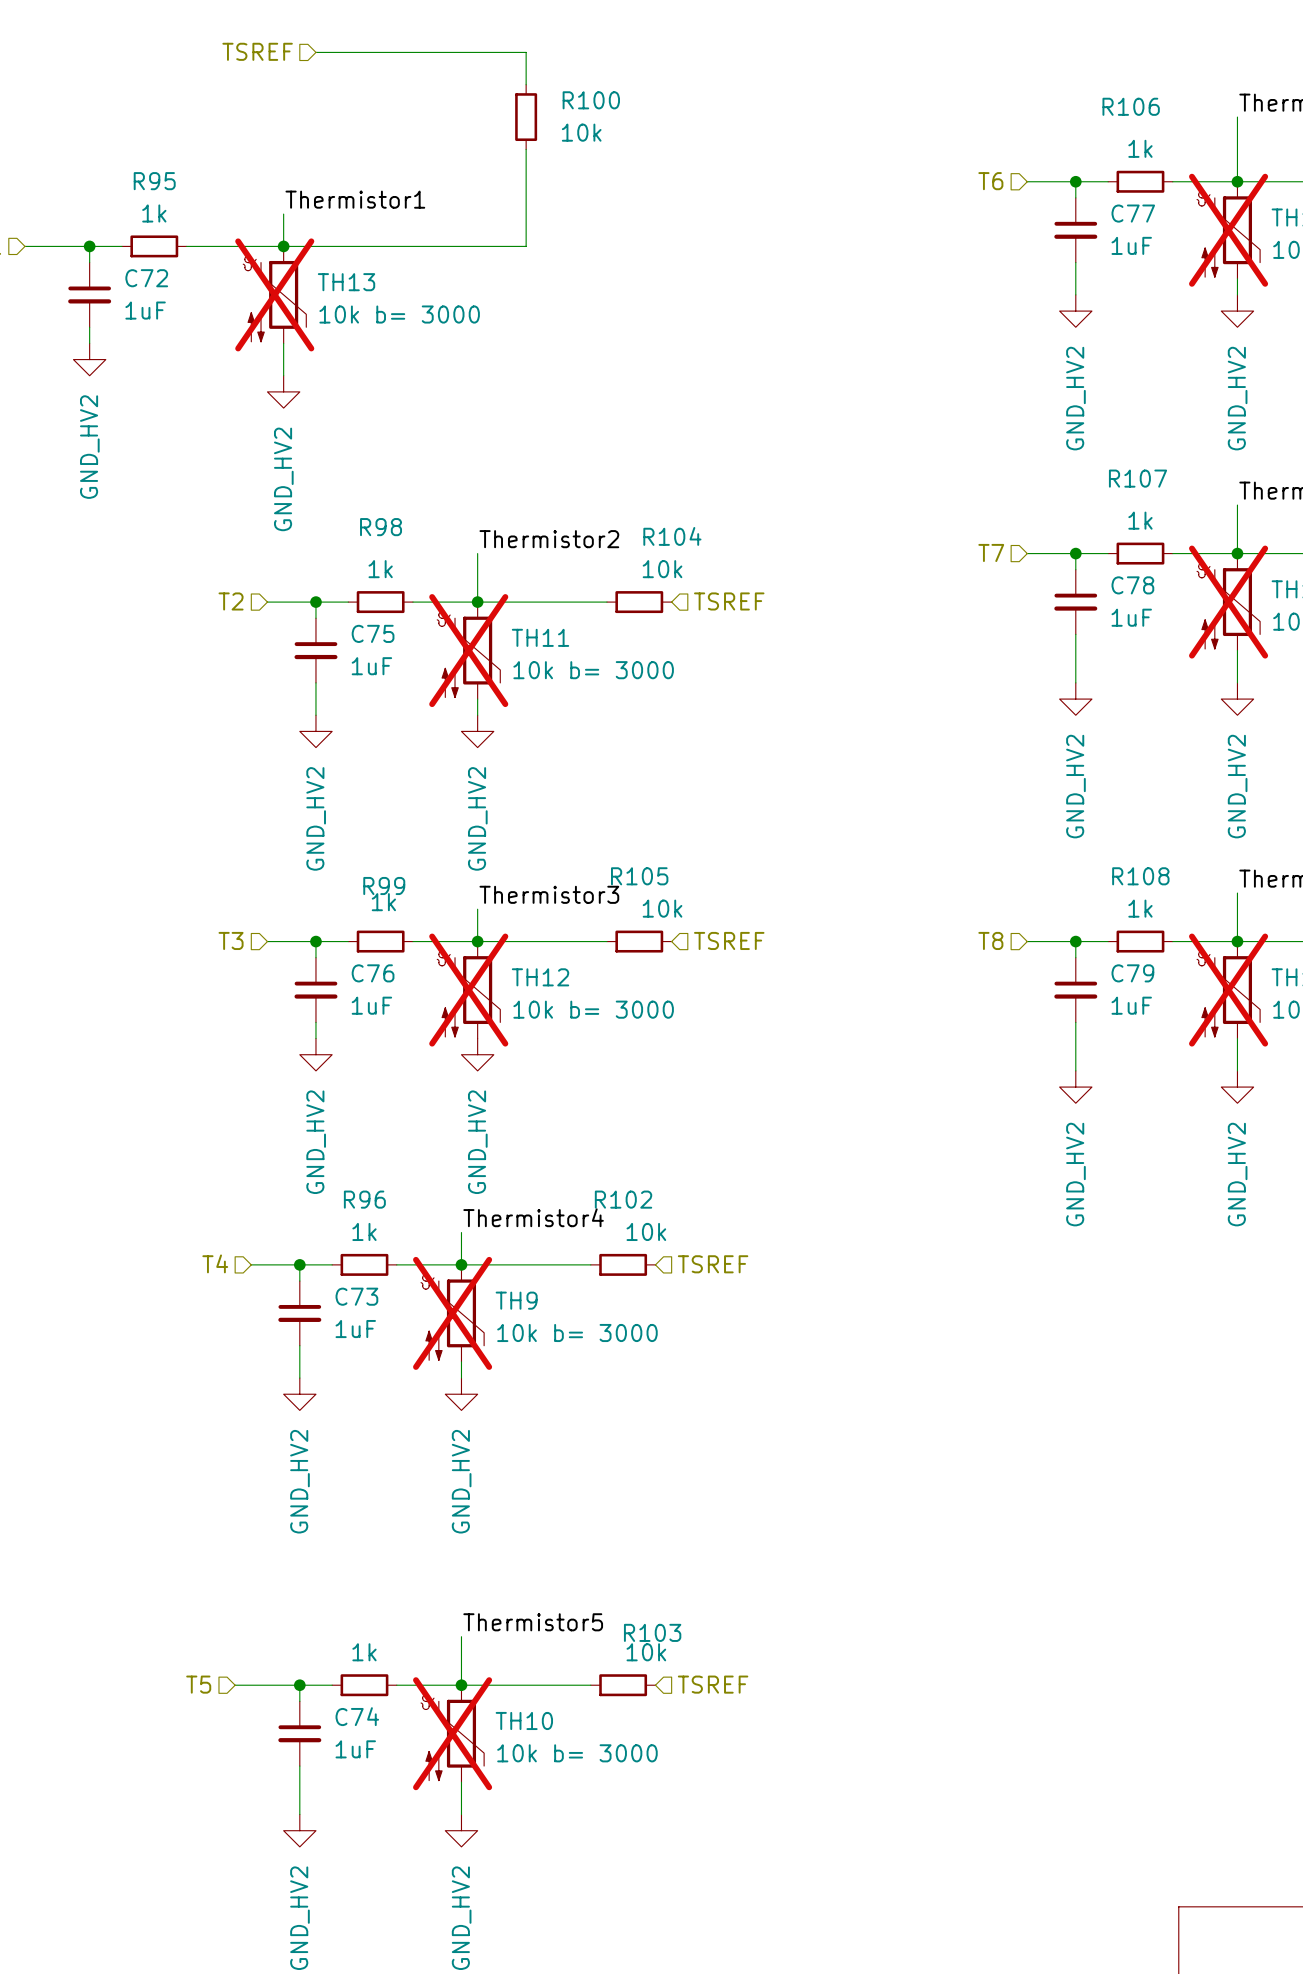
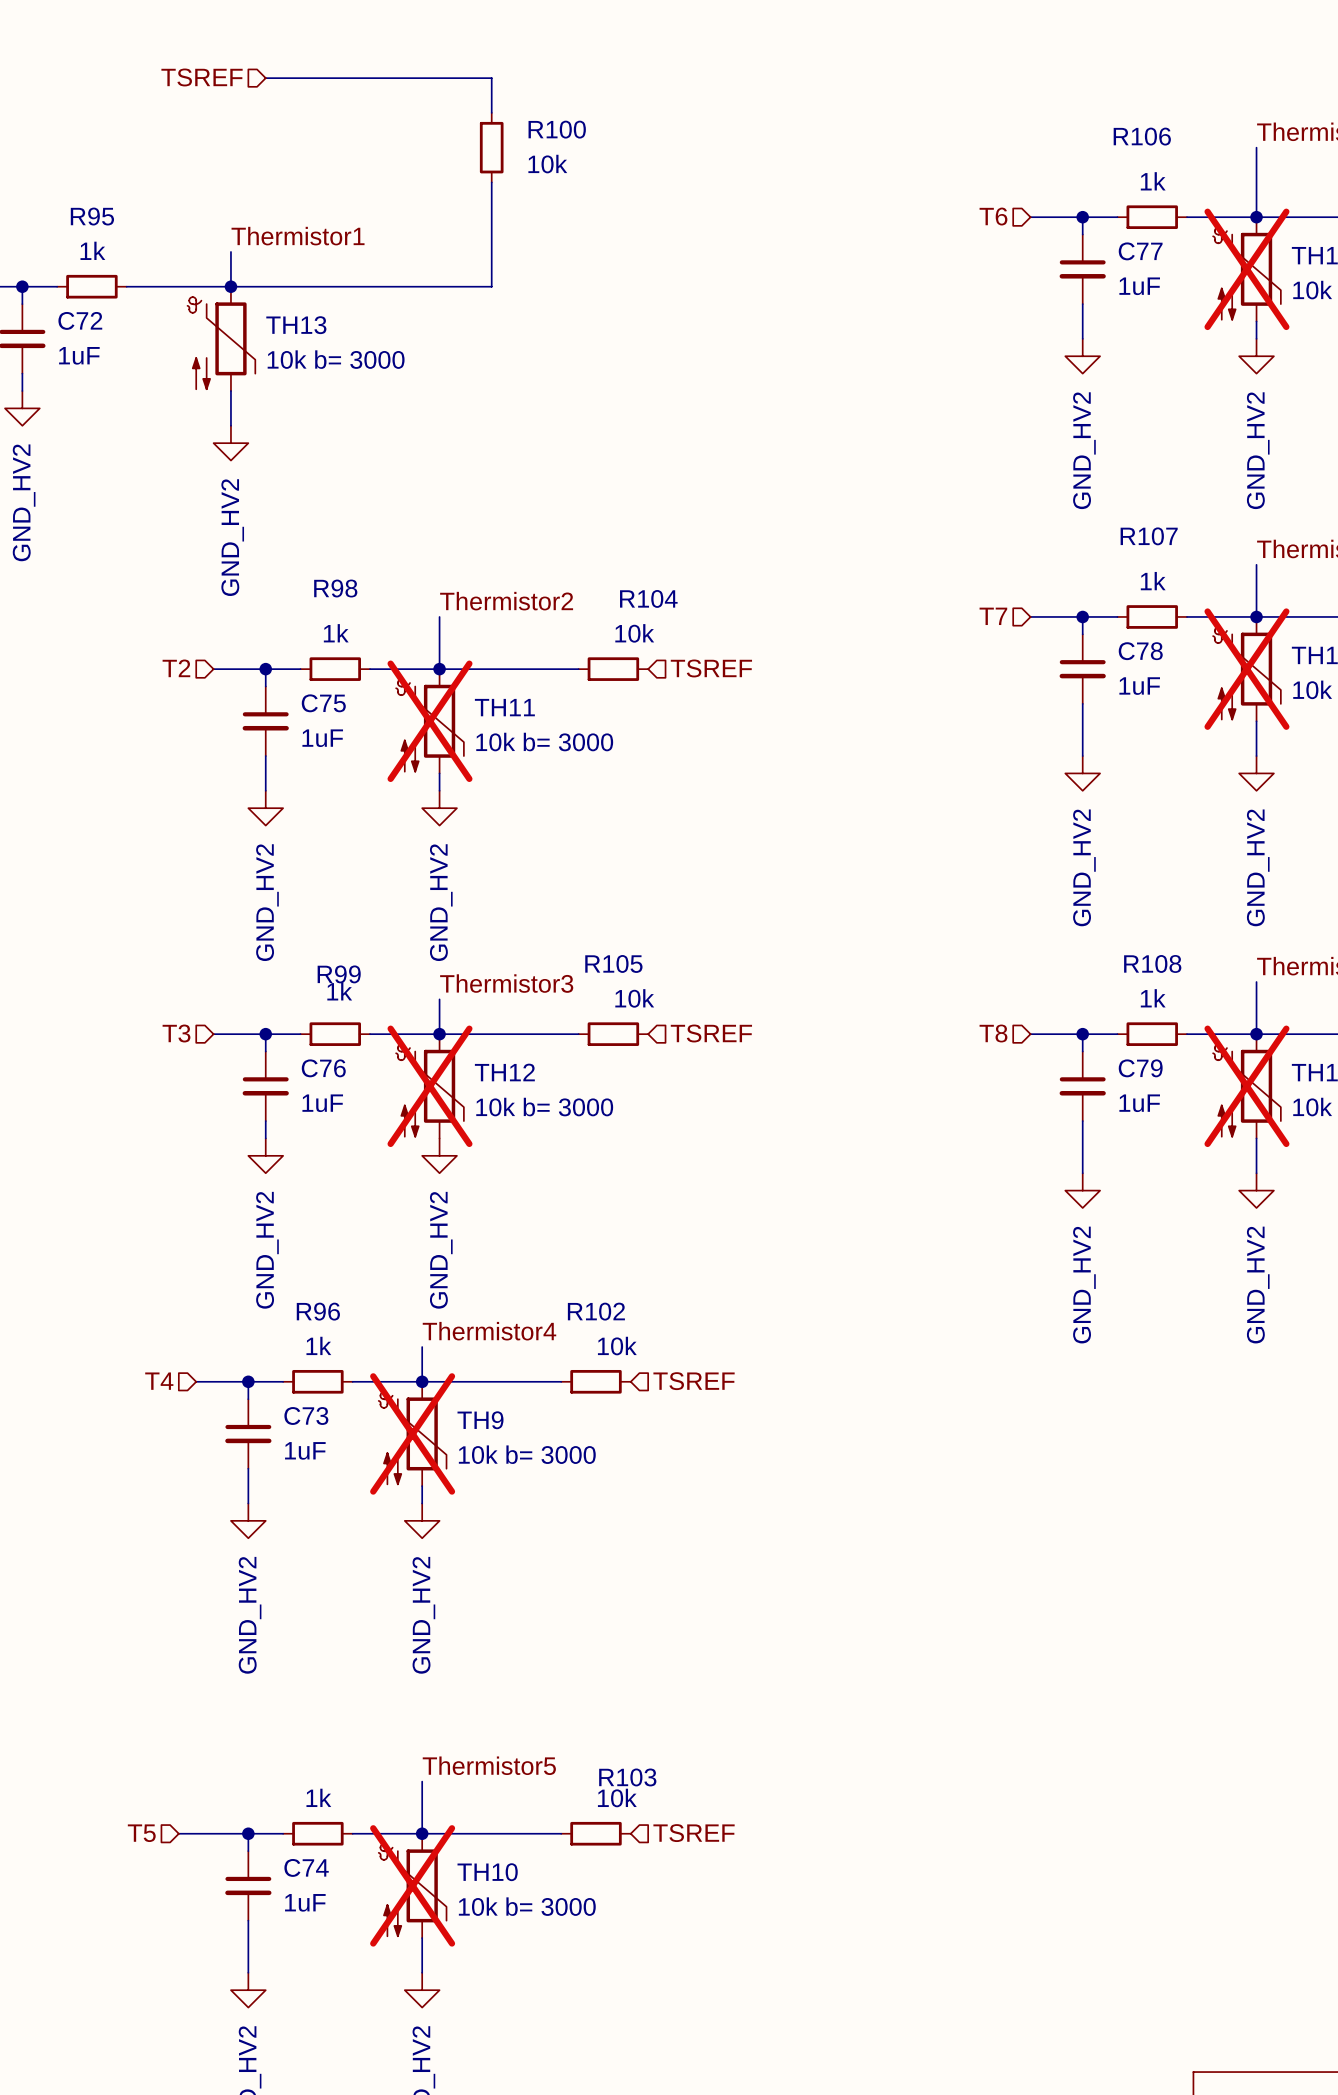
TH13 do-not-place cross: (274, 294) -> none

